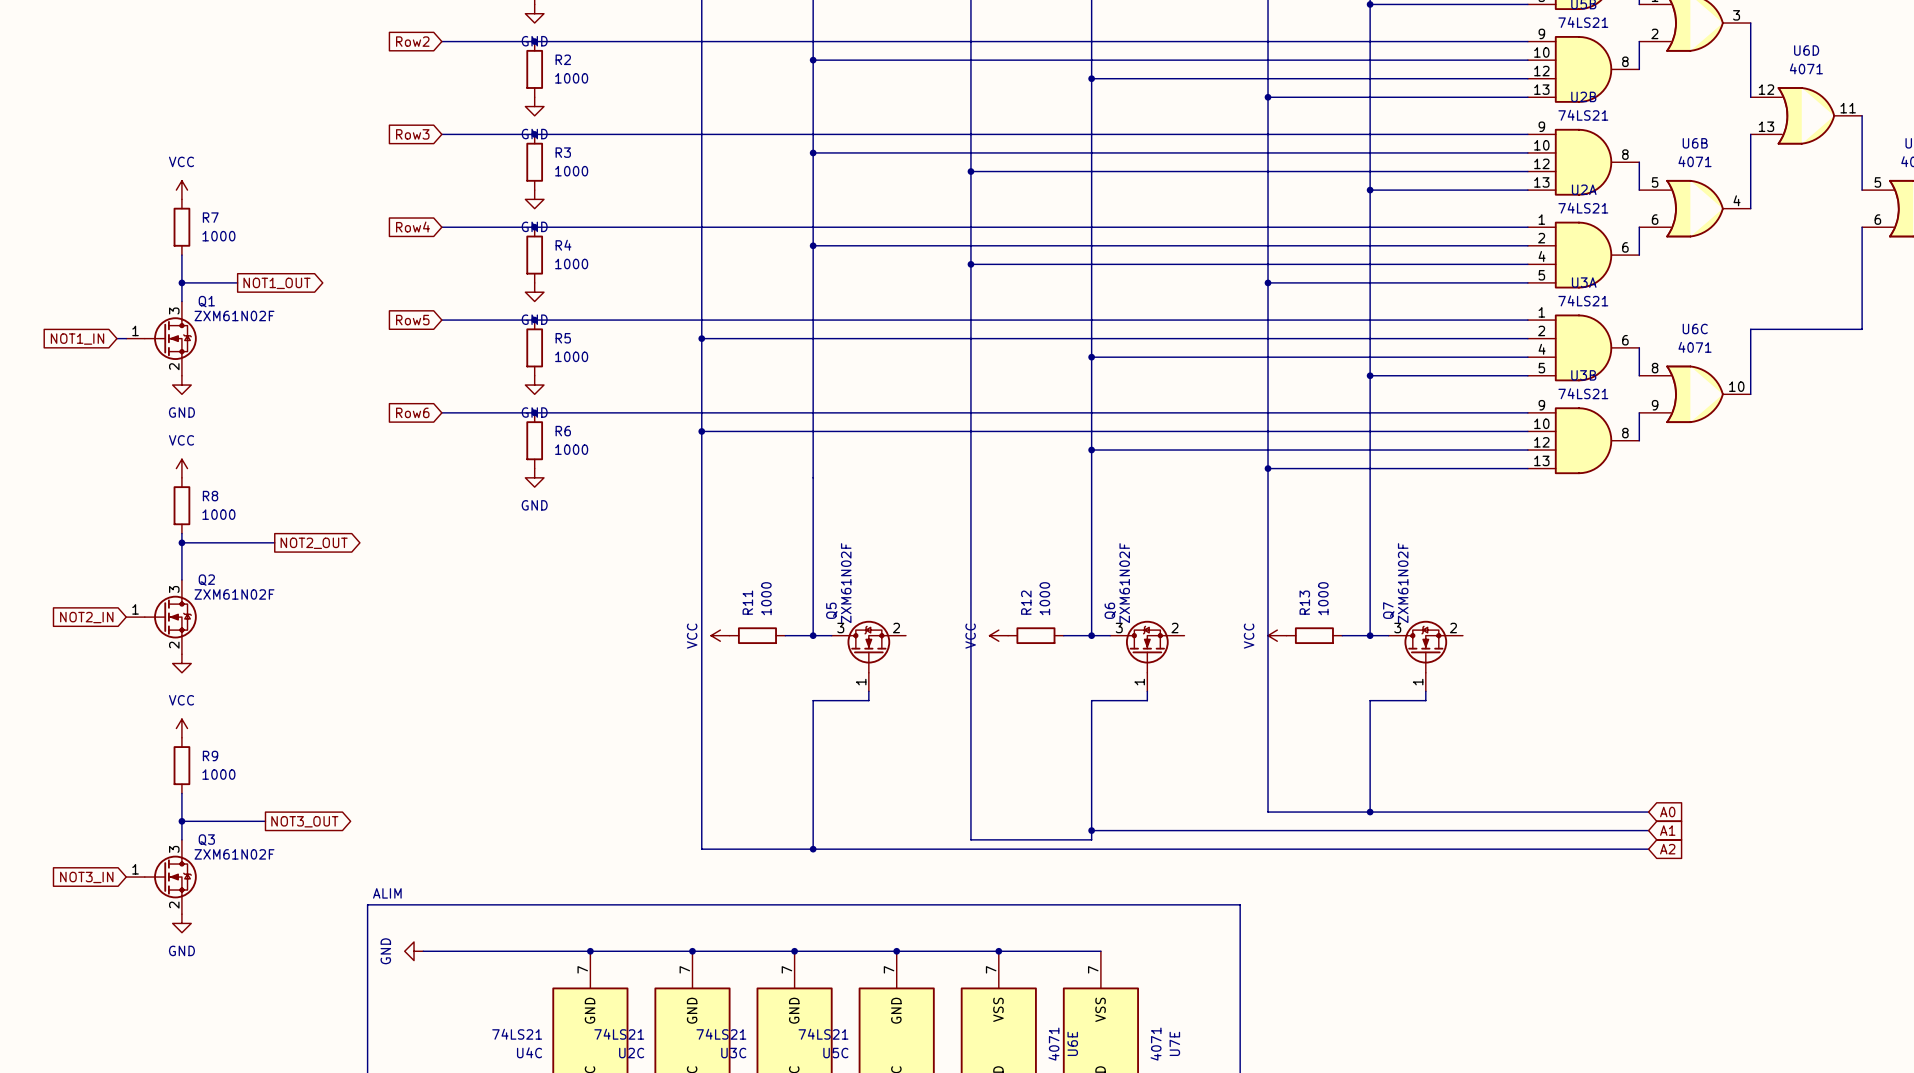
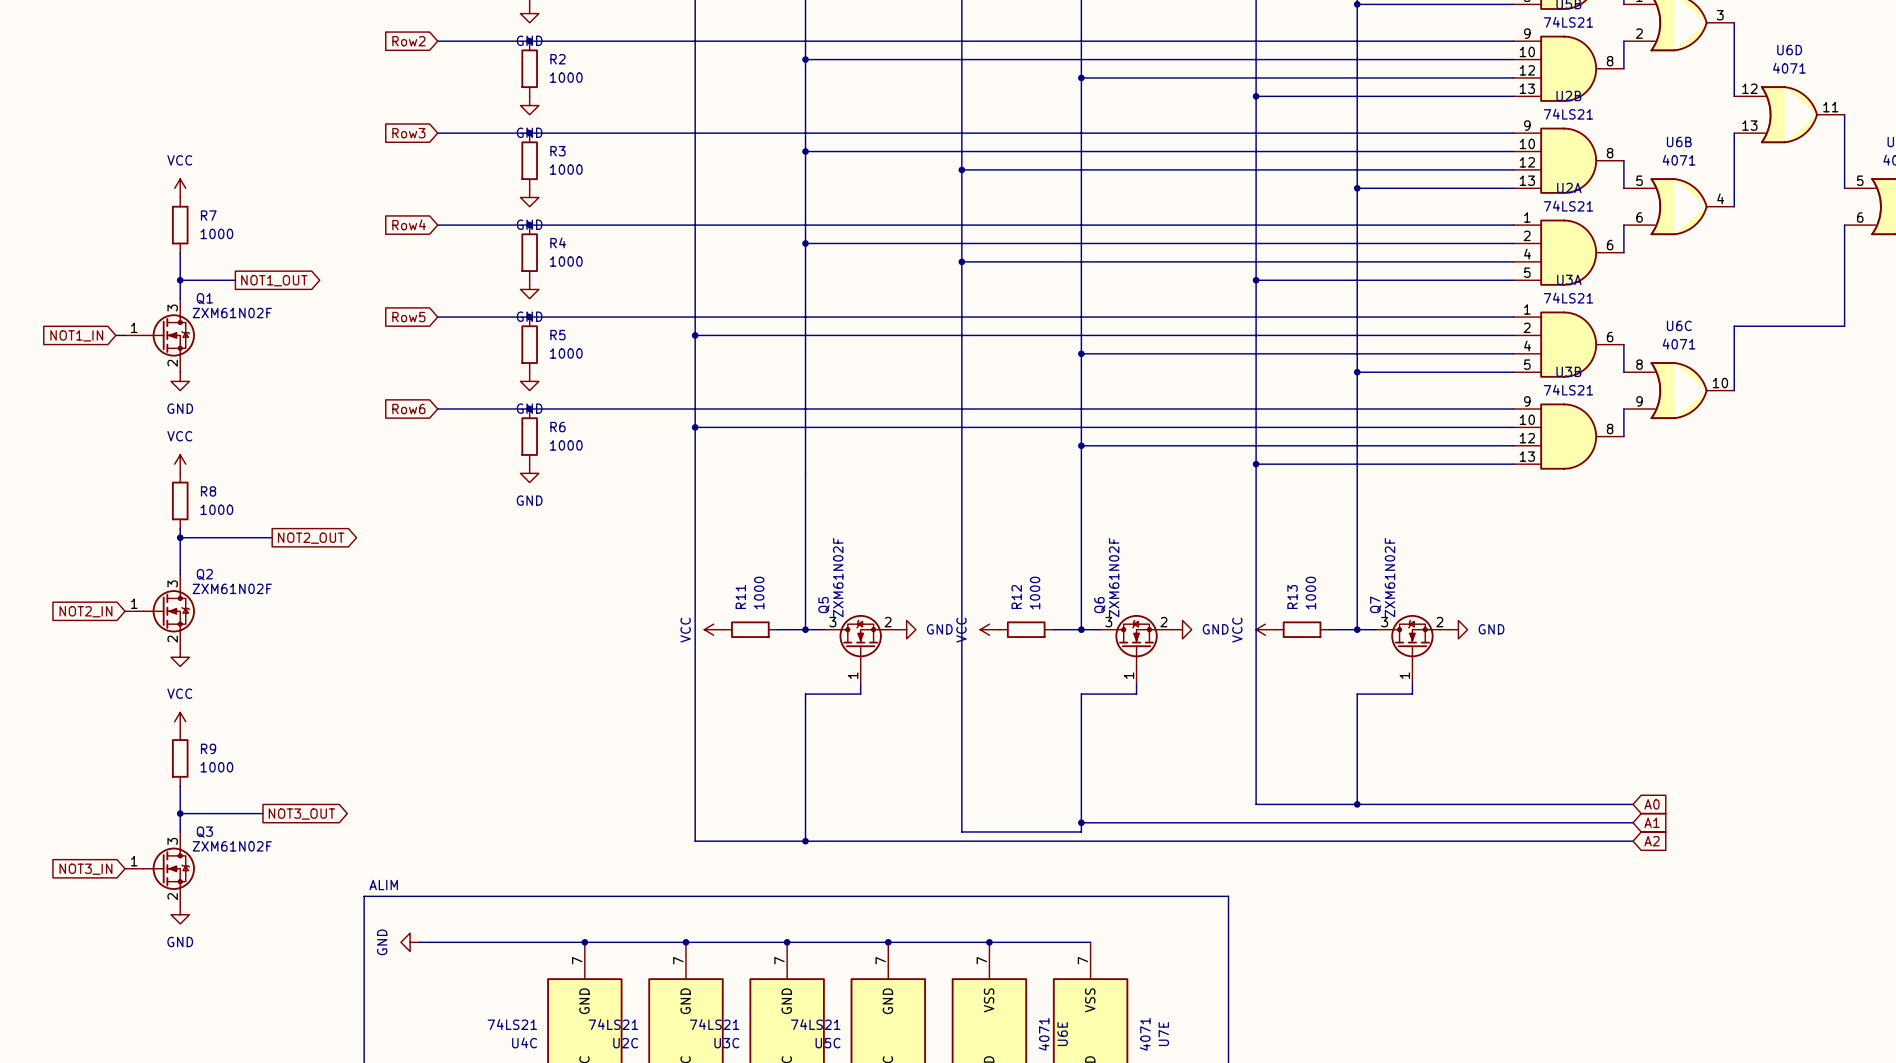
power symbol: none -> GND (906, 629)
power symbol: none -> GND (1182, 629)
power symbol: none -> GND (1458, 629)

